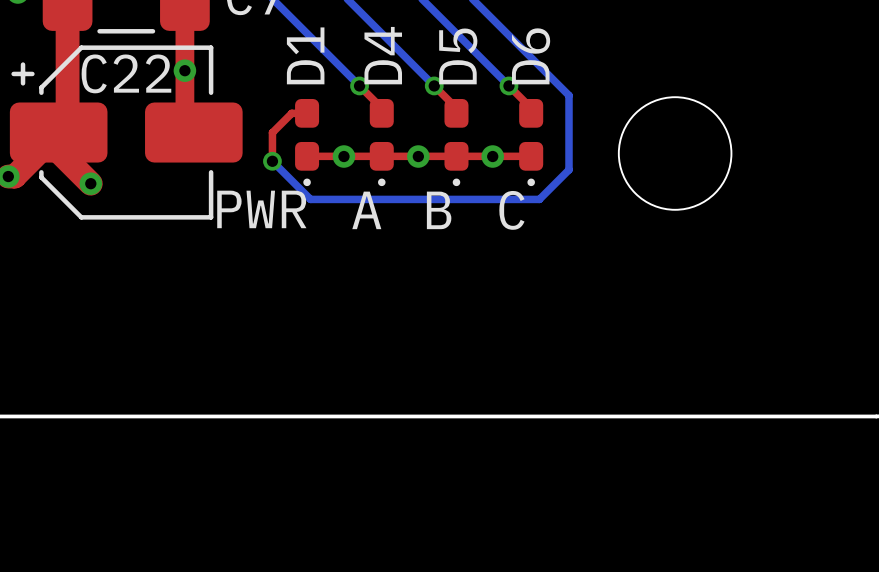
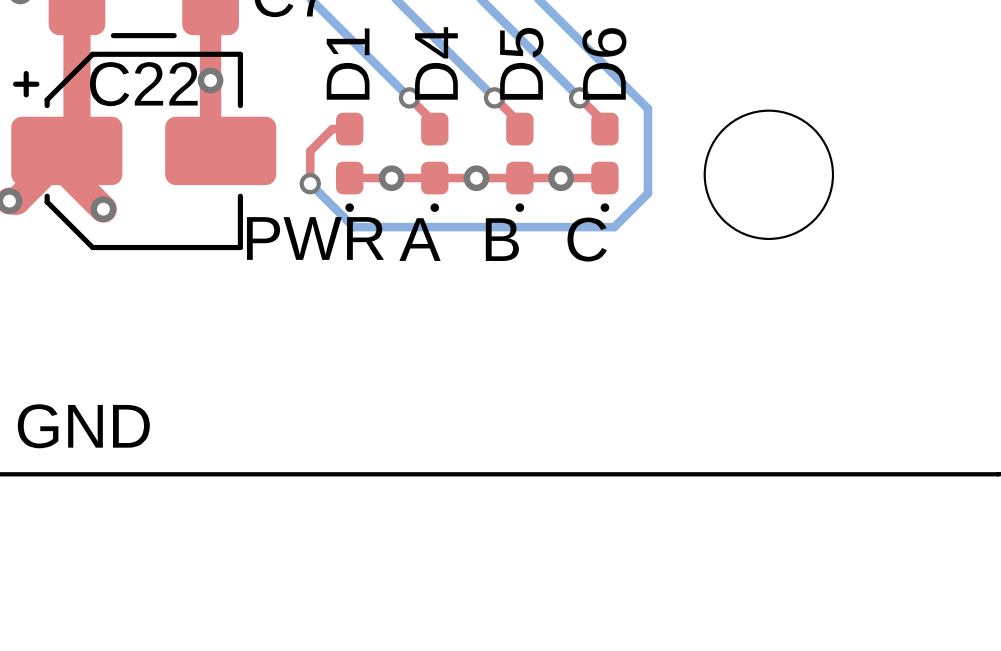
text: none -> GND (83, 426)

